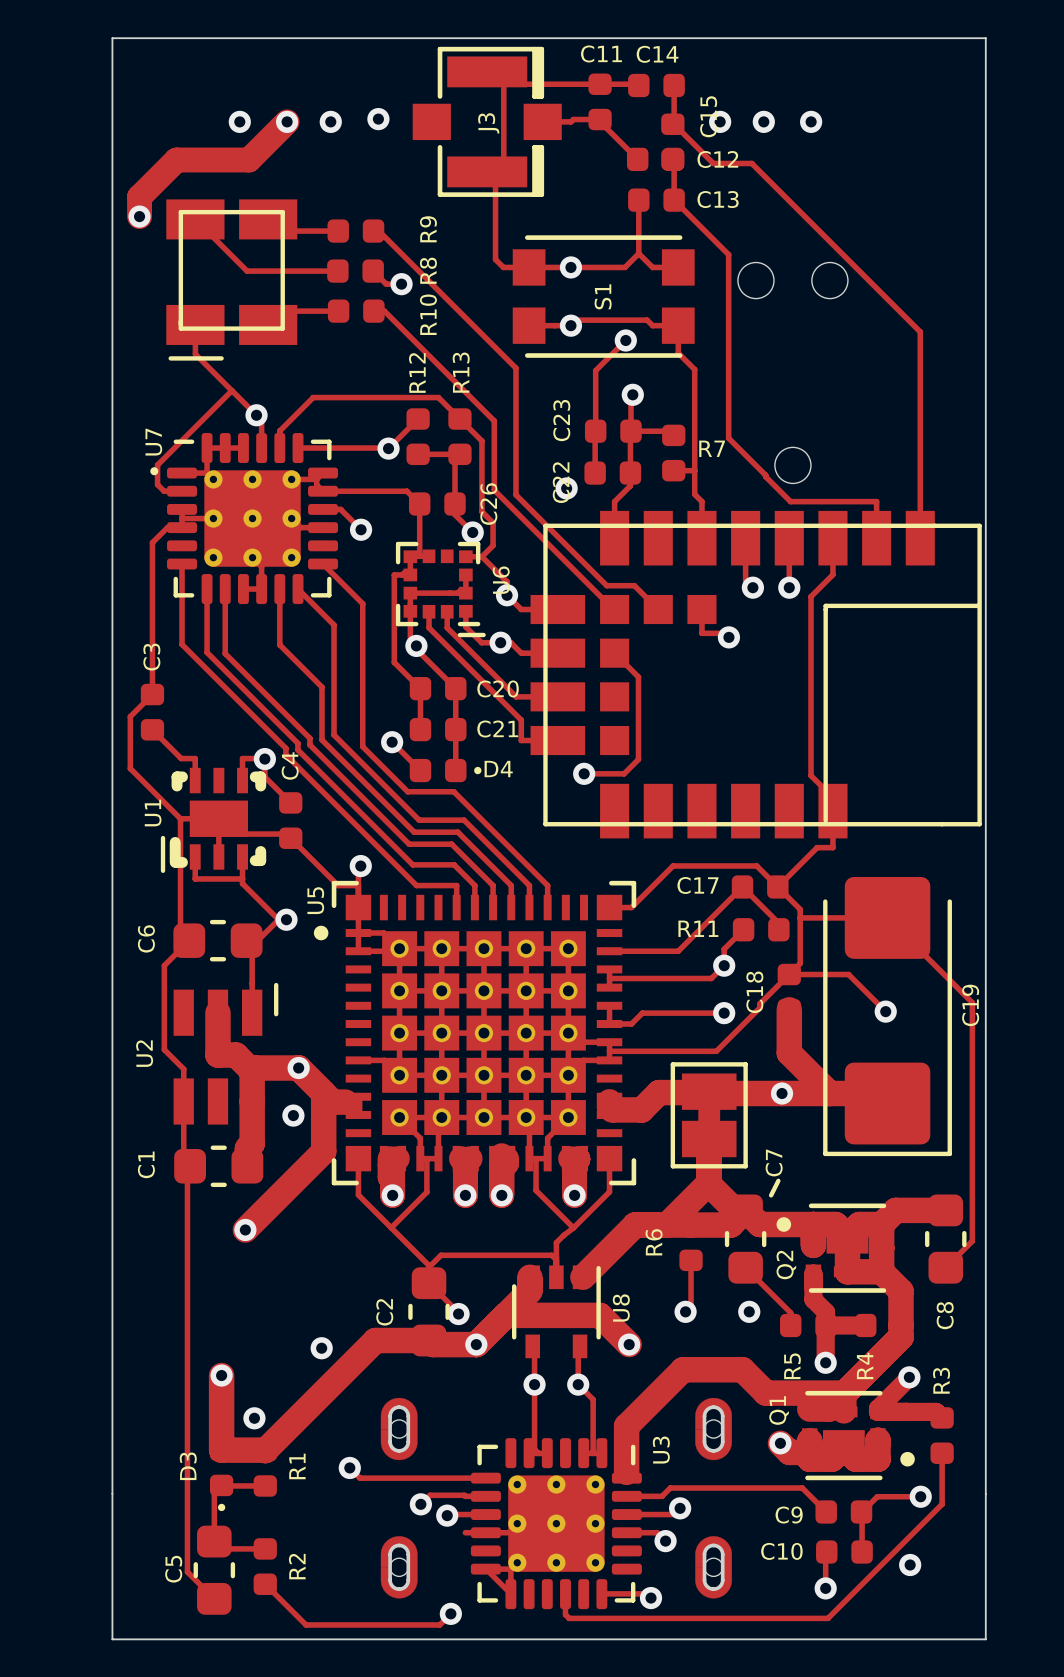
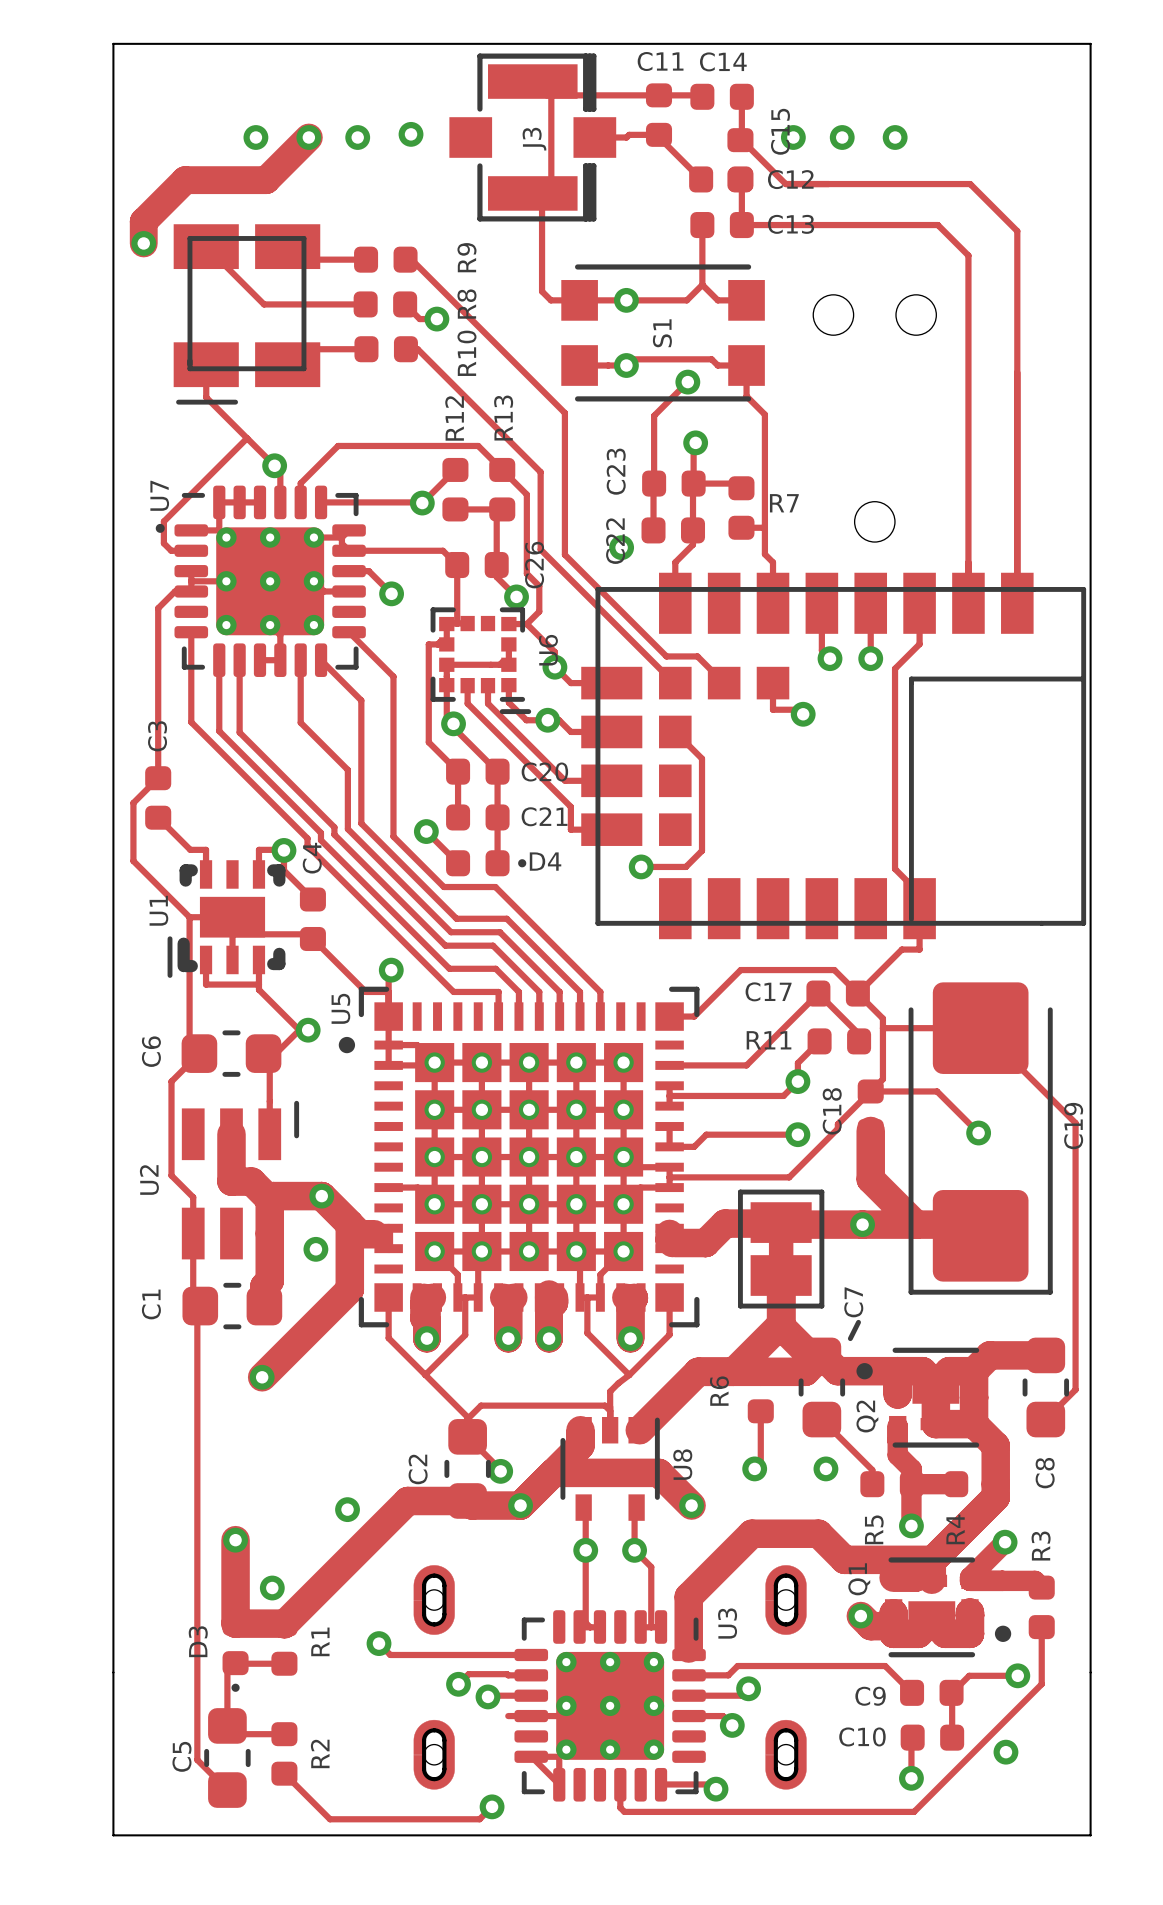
track: (751, 163) (920, 331) -> (828, 184) (970, 184) (1017, 231) (1017, 372)
track: (674, 200) (728, 254) (728, 438) (790, 501) (876, 501) -> (741, 225) (937, 225) (968, 255) (968, 562)

